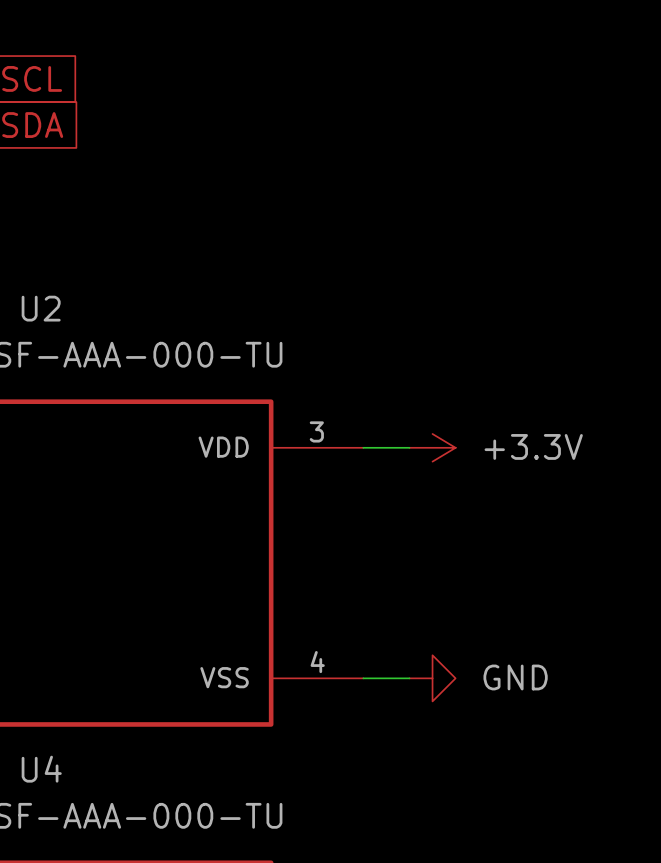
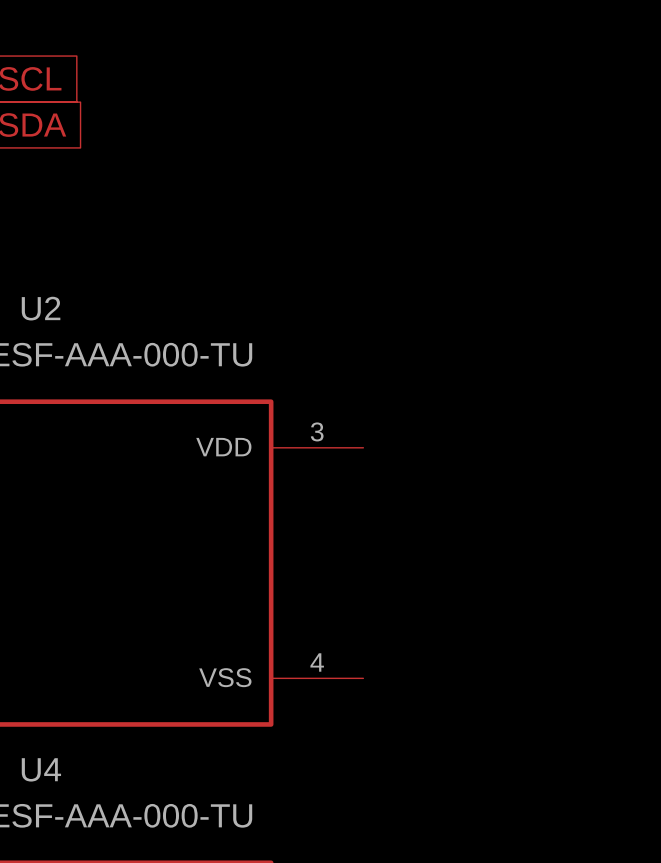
wire: (363, 447) (409, 447) -> none
power symbol: +3.3V (432, 447) -> none
wire: (363, 678) (409, 678) -> none
power symbol: GND (432, 678) -> none

